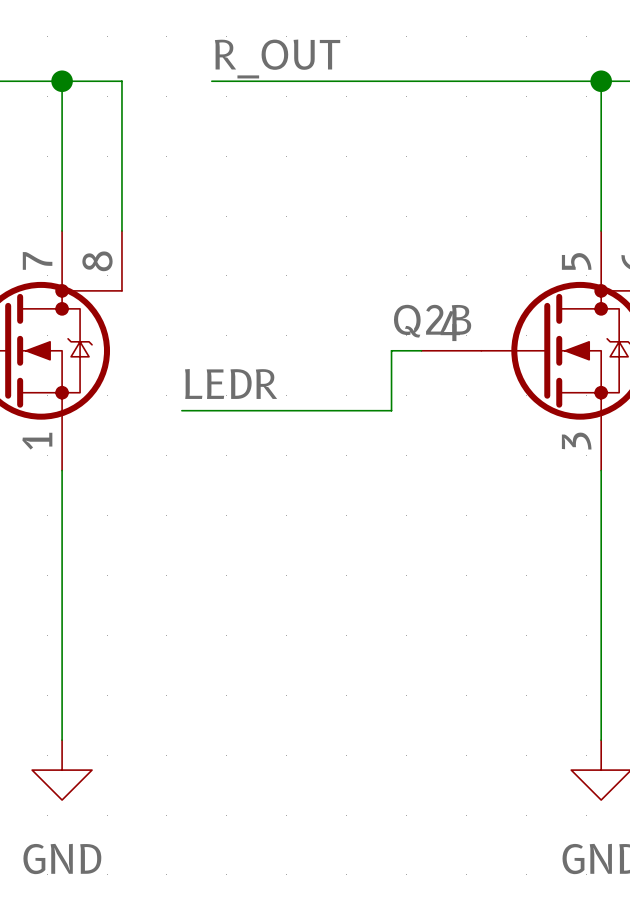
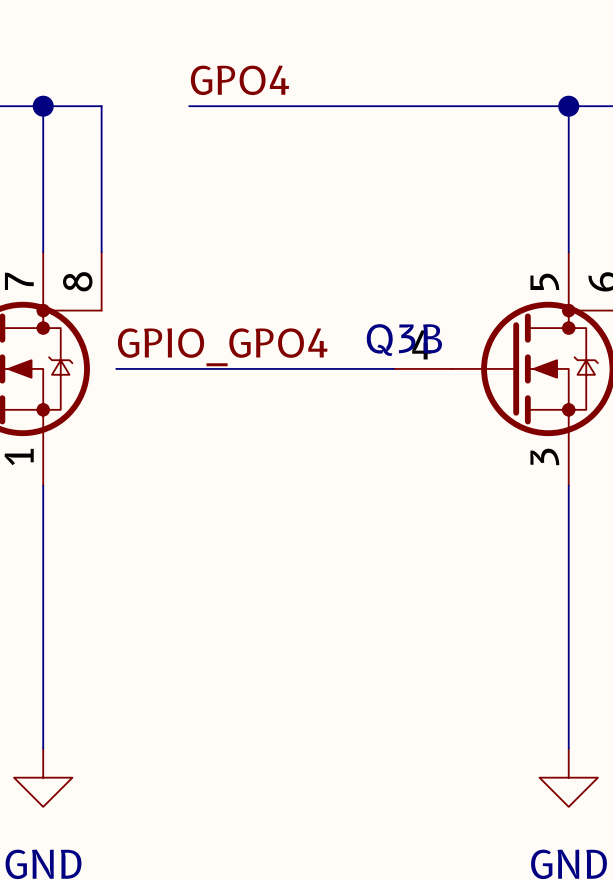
label: R_OUT (277, 59) -> GPO4 (239, 80)
Q2B name: Q2B (432, 321) -> Q3B (404, 340)
label: none -> GPIO_GPO4 (222, 347)
wire: (391, 350) (391, 410) (181, 410) -> (364, 368) (116, 368)
label: LEDR (231, 383) -> none

